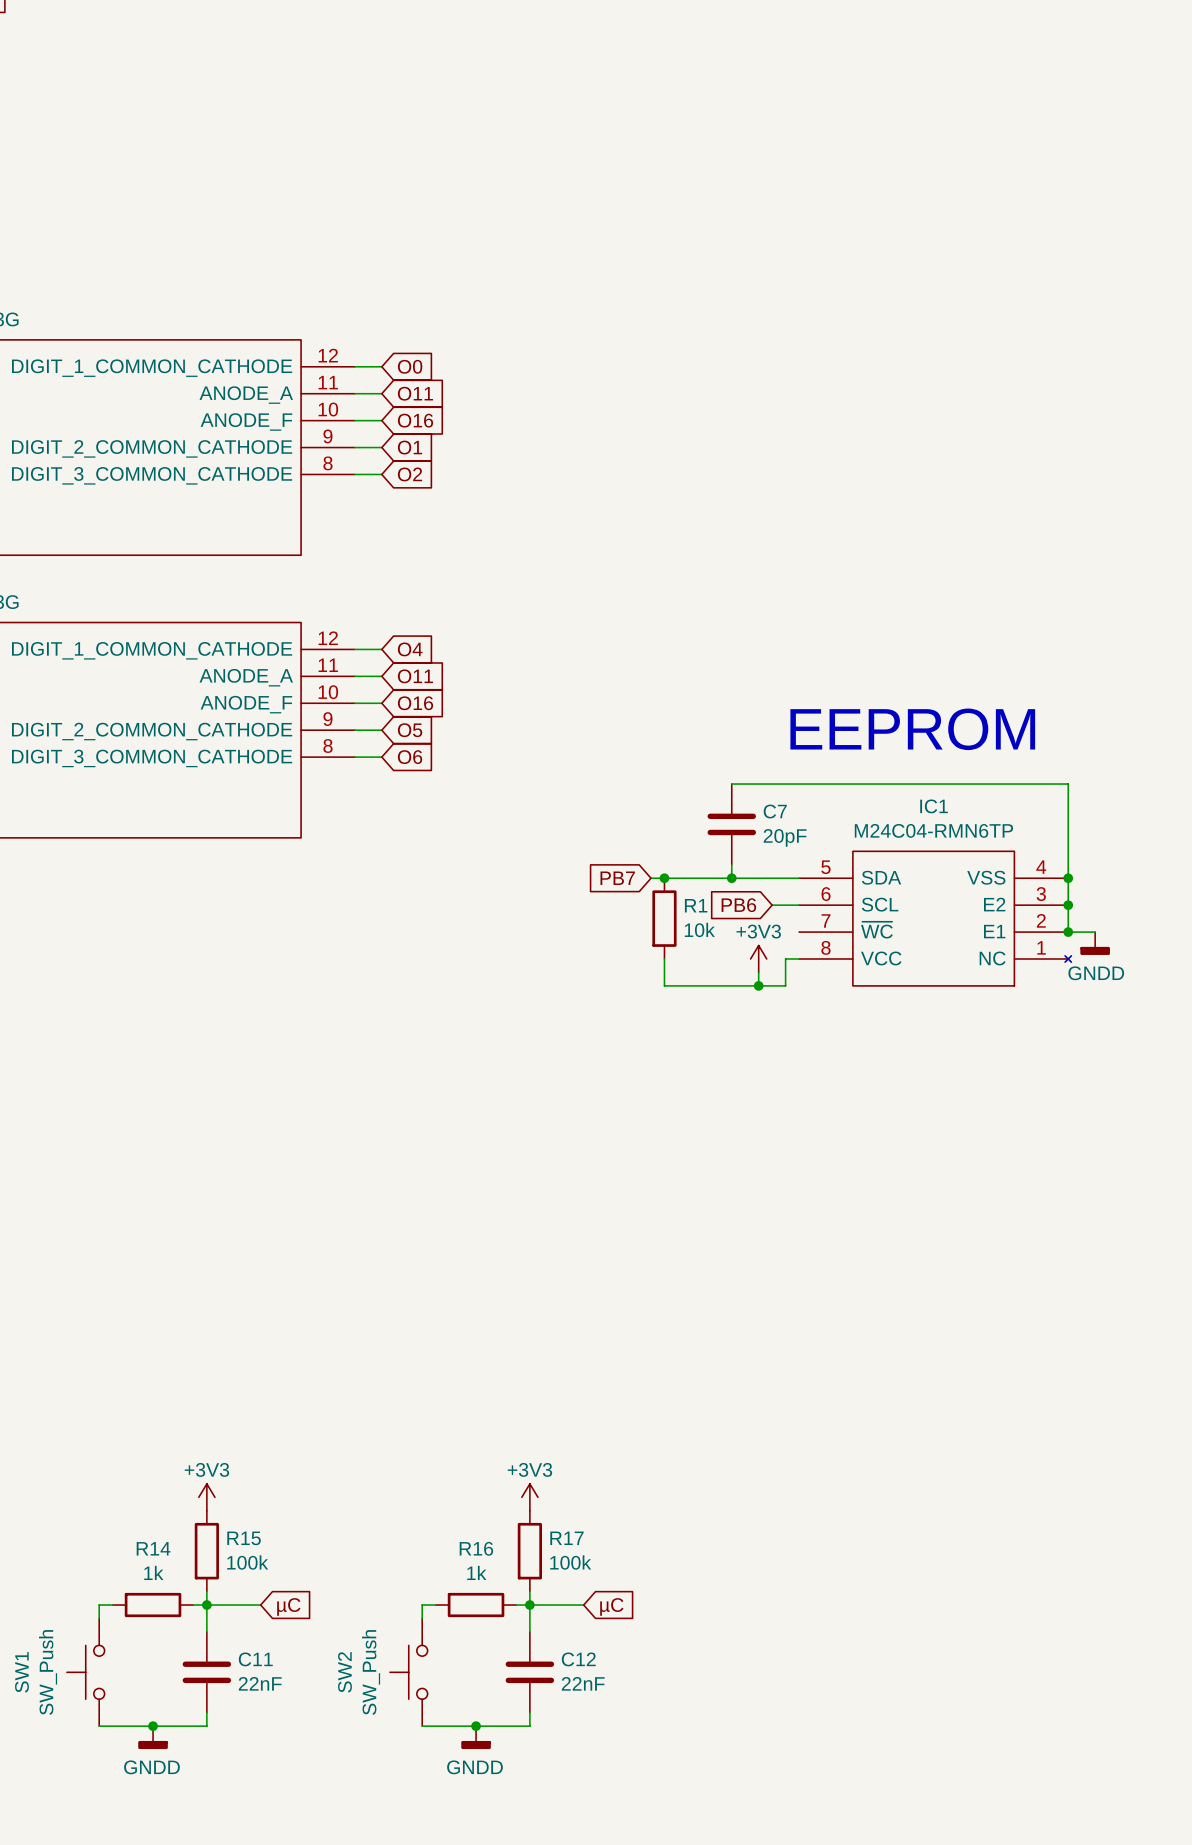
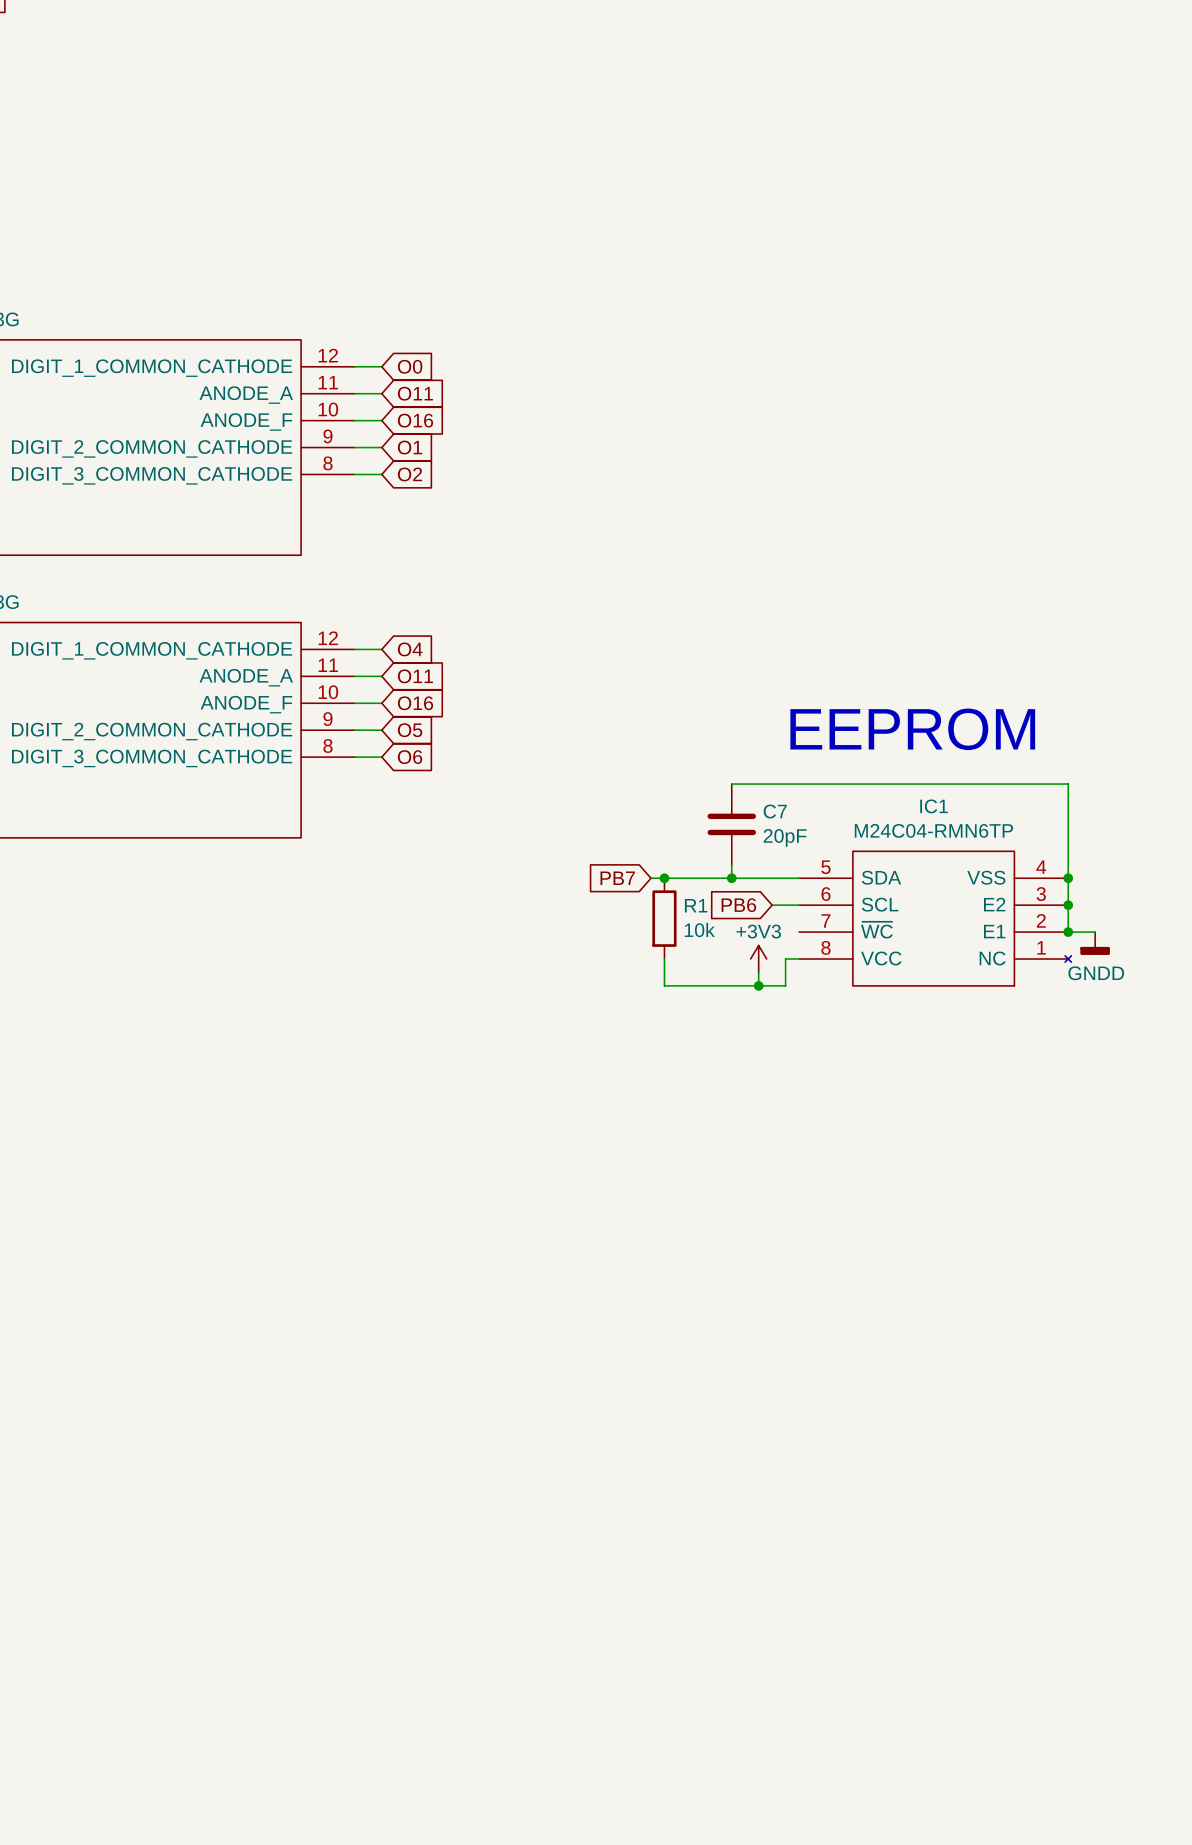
power symbol: +3V3 (206, 1497) -> none
power symbol: +3V3 (529, 1497) -> none
R15: 100k (206, 1551) -> none
R17: 100k (529, 1551) -> none
wire: (206, 1591) (206, 1631) -> none
wire: (529, 1591) (529, 1631) -> none
wire: (112, 1605) (99, 1605) (99, 1618) -> none
R14: 1k (153, 1605) -> none
wire: (193, 1605) (260, 1605) -> none
junction: (206, 1605) -> none
wire: (435, 1605) (422, 1605) (422, 1618) -> none
R16: 1k (476, 1605) -> none
wire: (516, 1605) (583, 1605) -> none
junction: (529, 1605) -> none
global label: µC (288, 1606) -> none
global label: µC (611, 1606) -> none
SW1: SW_Push (85, 1672) -> none
C11: 22nF (206, 1672) -> none
SW2: SW_Push (408, 1672) -> none
C12: 22nF (529, 1672) -> none
wire: (206, 1712) (206, 1726) (99, 1726) -> none
wire: (529, 1712) (529, 1726) (422, 1726) -> none
junction: (153, 1726) -> none
junction: (476, 1726) -> none
power symbol: GNDD (153, 1737) -> none
power symbol: GNDD (476, 1737) -> none

